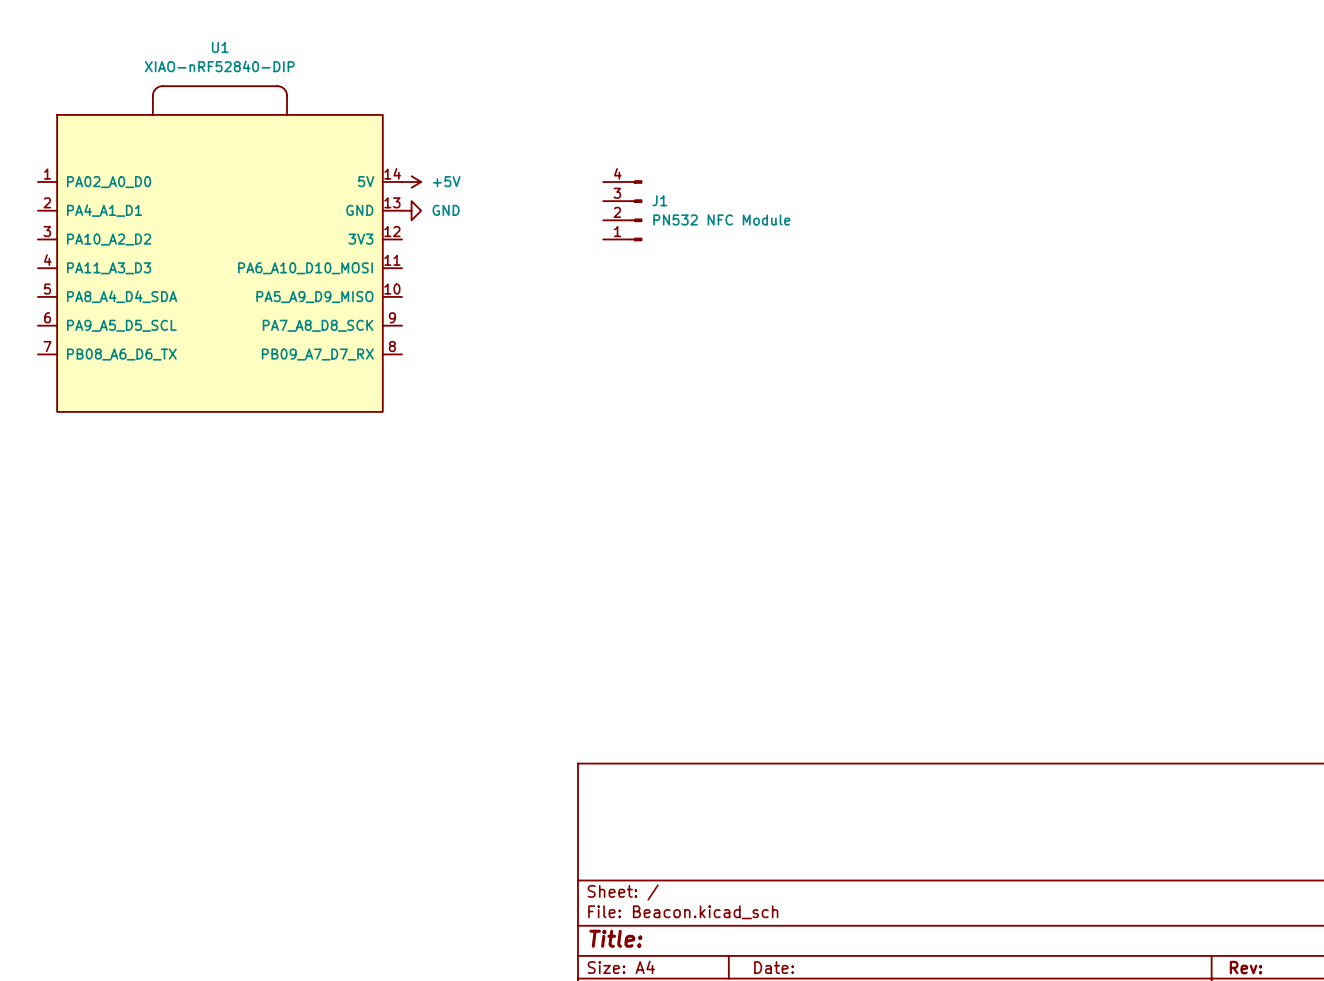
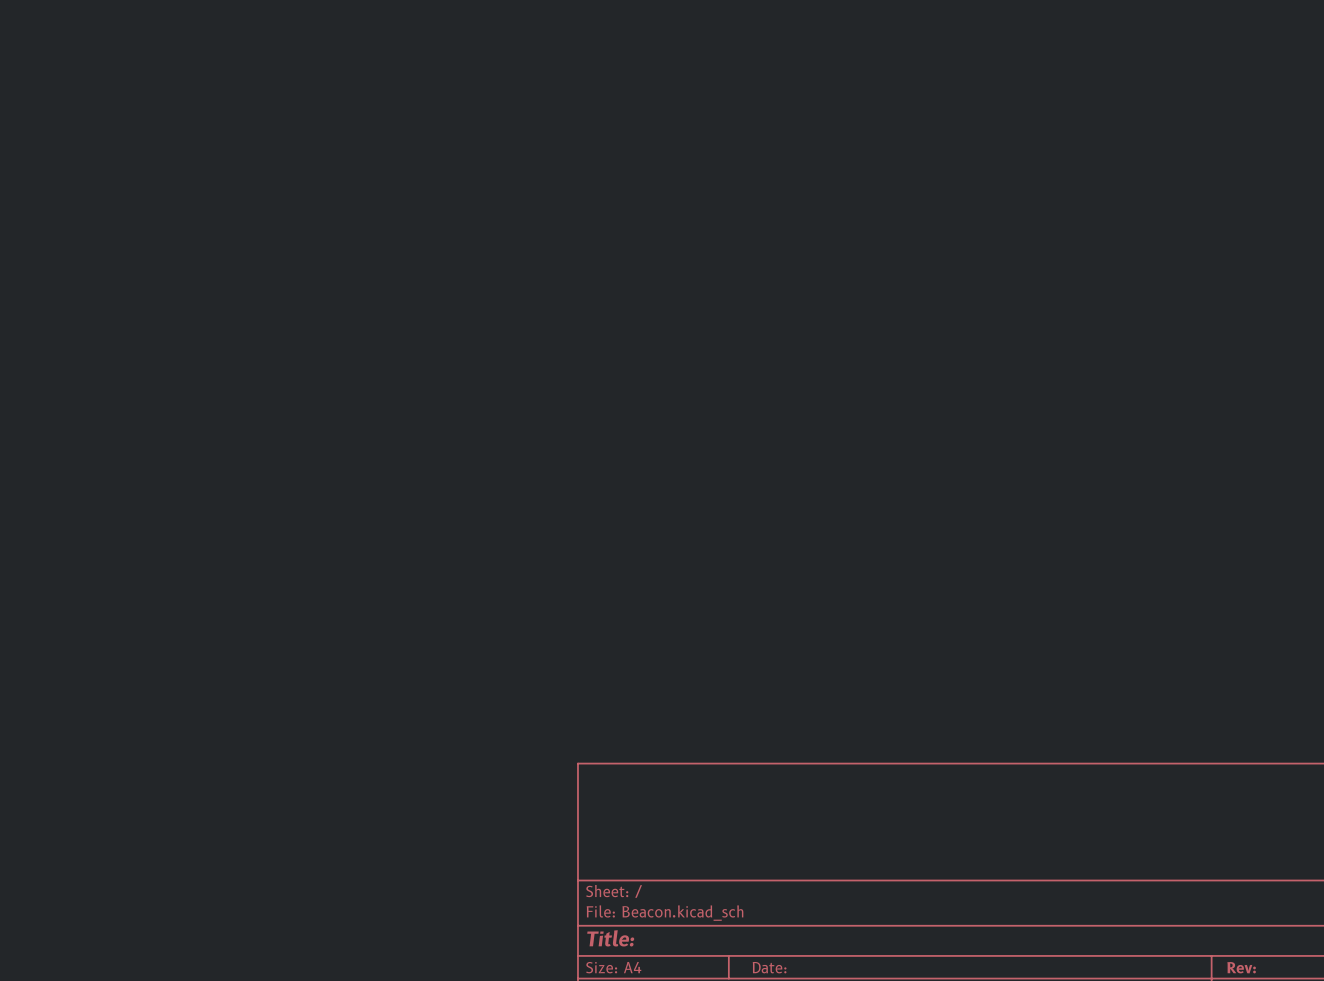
power symbol: +5V (411, 181) -> none
power symbol: GND (411, 210) -> none
J1: PN532 NFC Module (622, 210) -> none
U1: XIAO-nRF52840-DIP (219, 249) -> none

